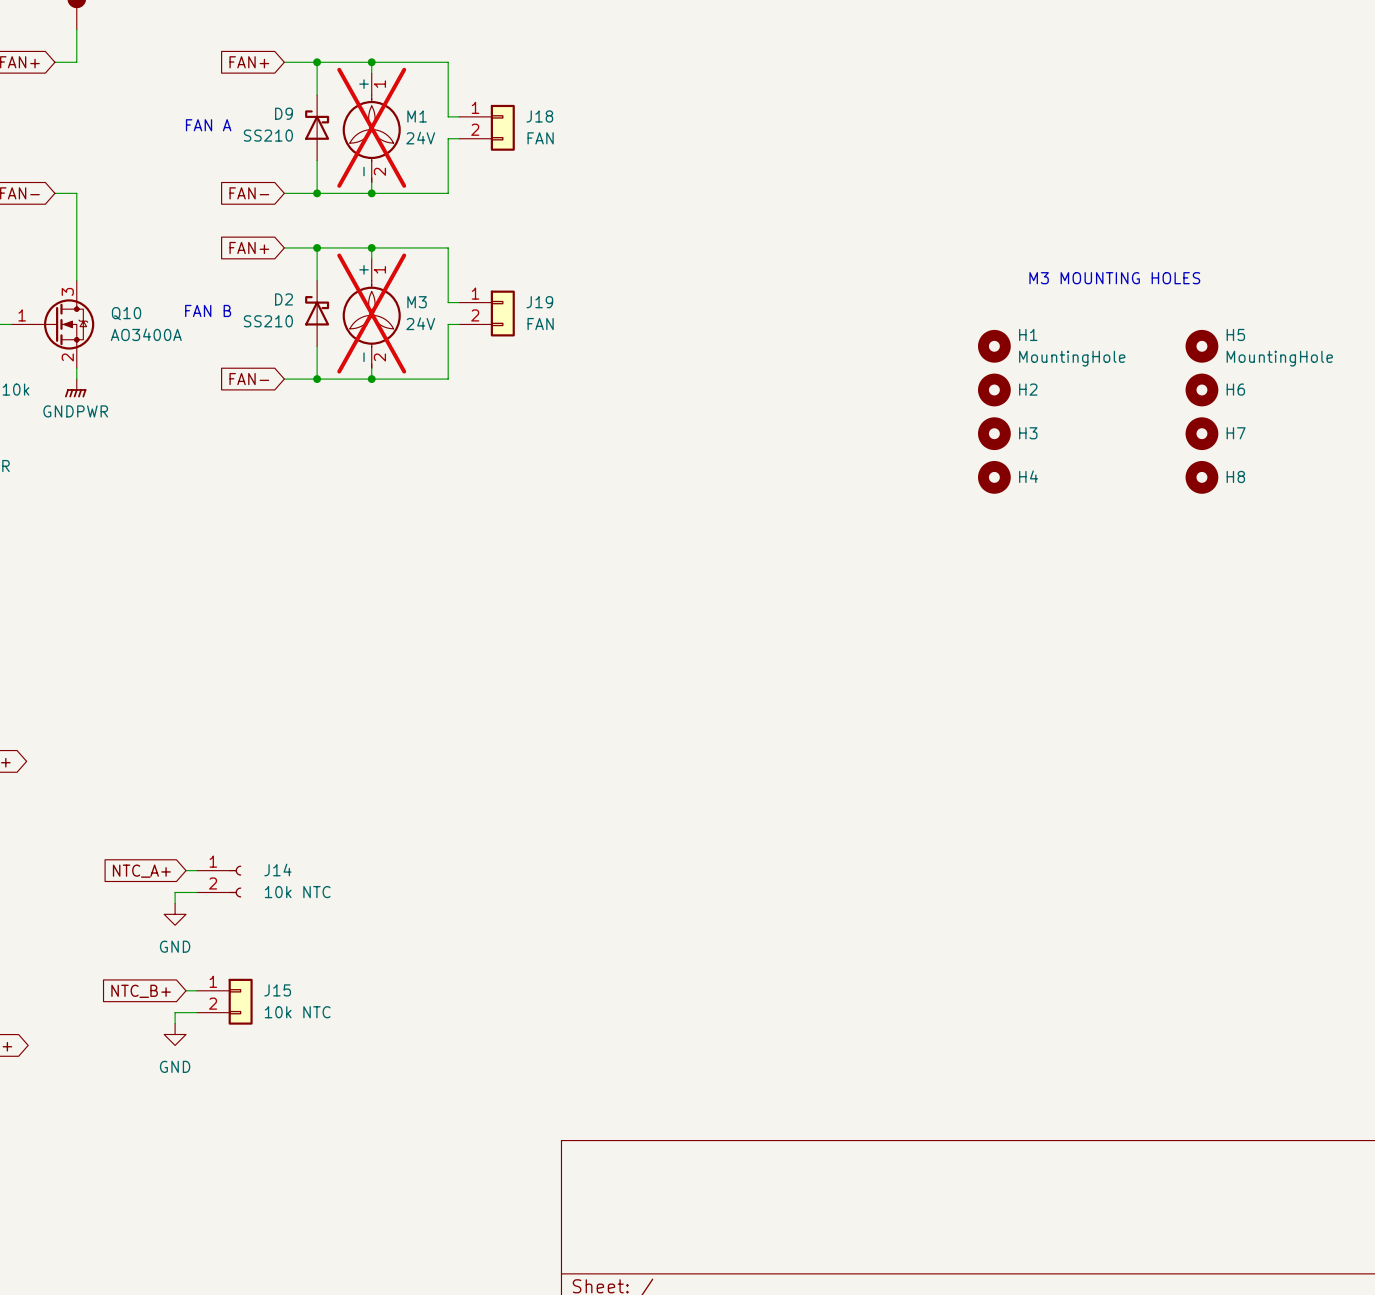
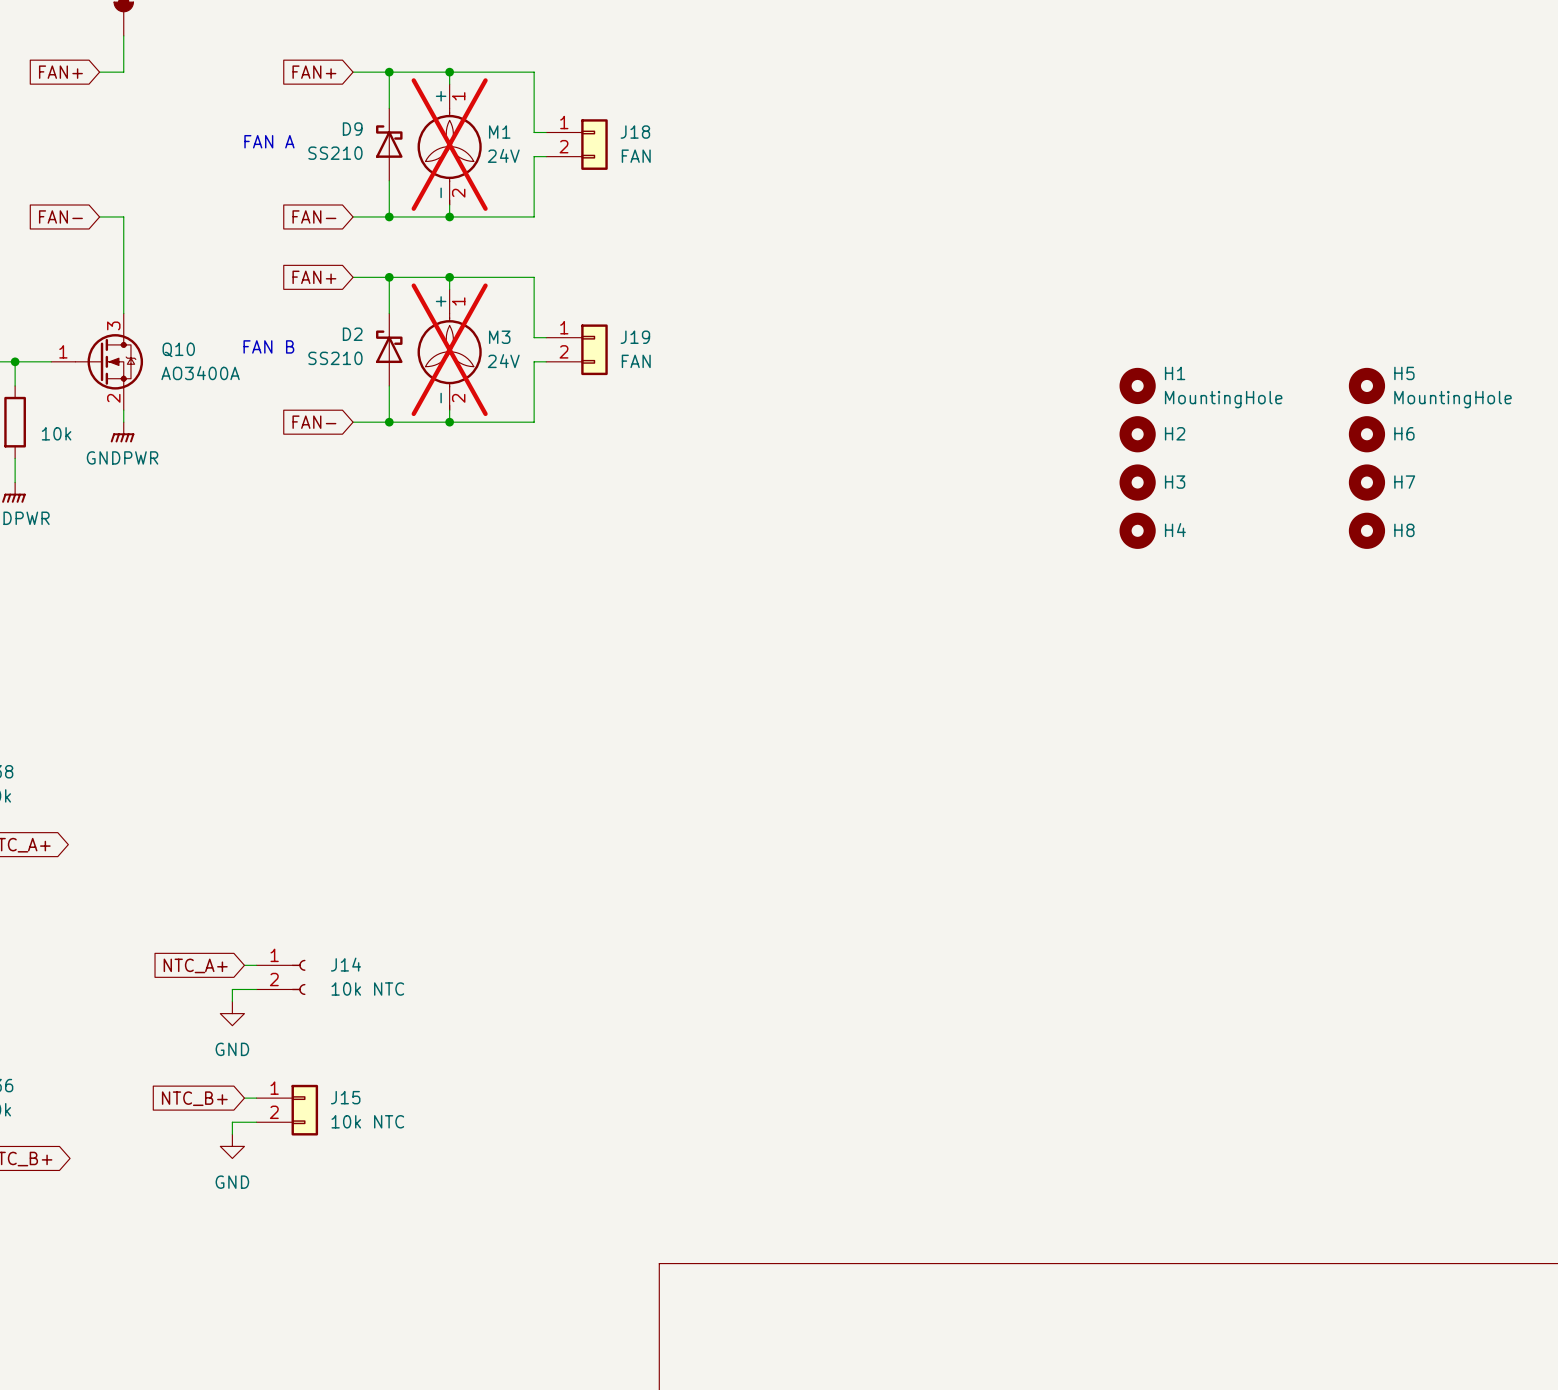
text: M3 MOUNTING HOLES (1114, 278) -> none

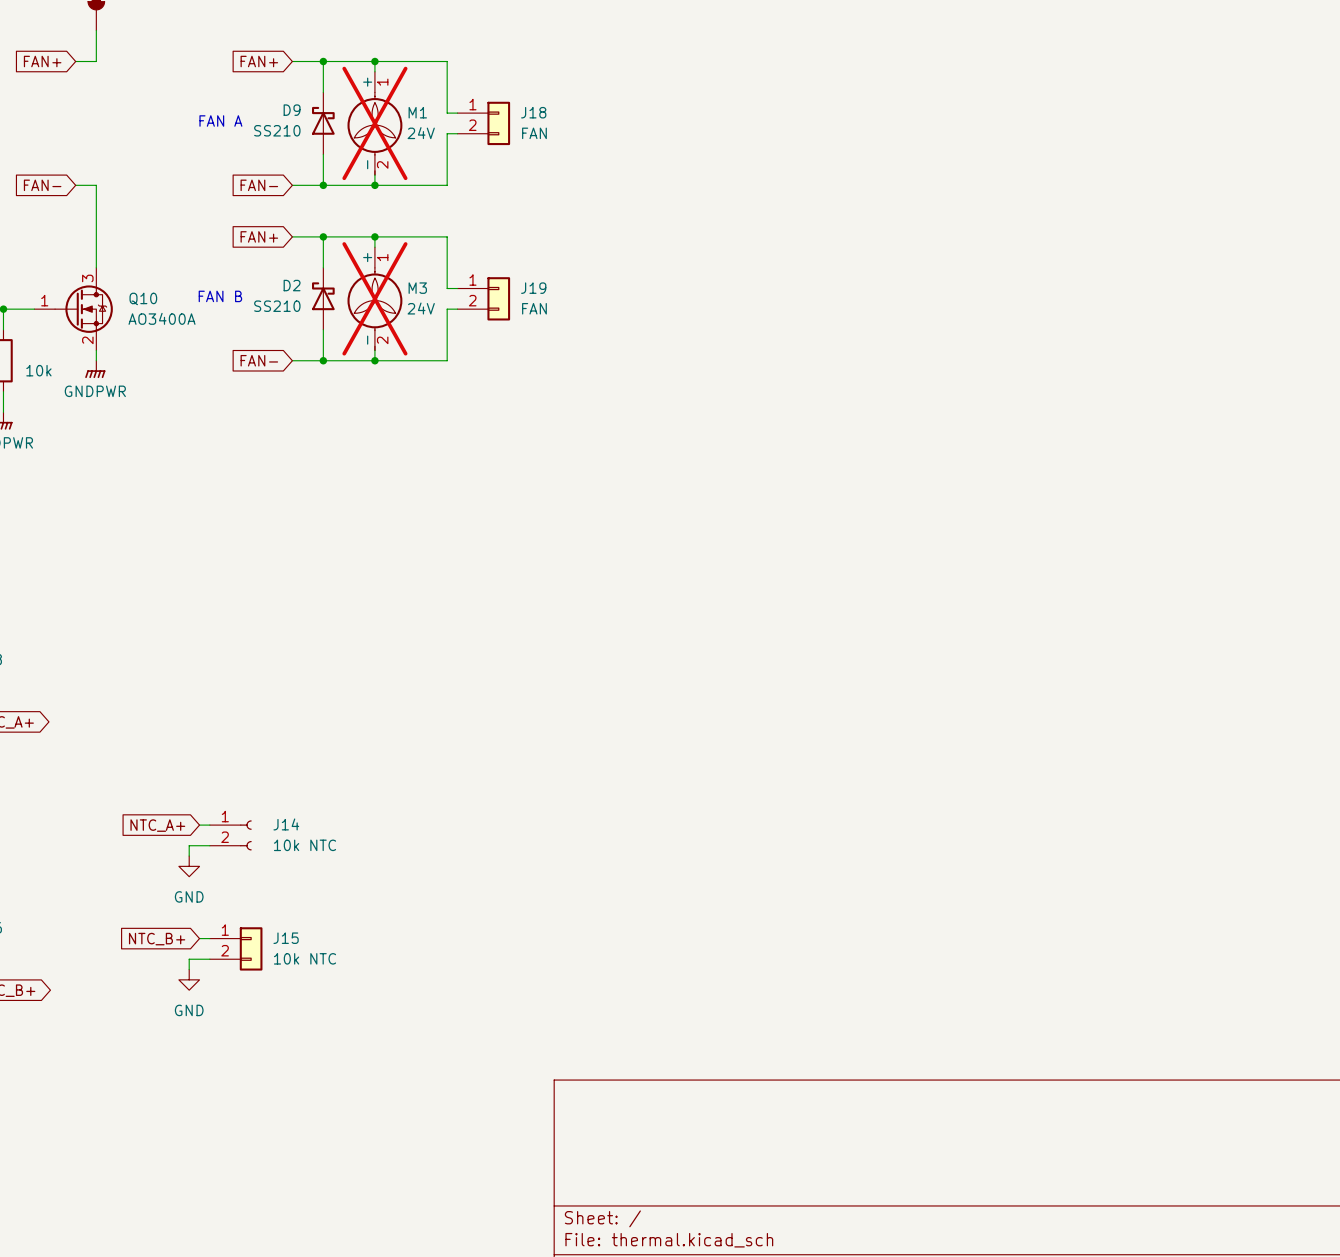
H1: MountingHole (1137, 385) -> none
H5: MountingHole (1366, 385) -> none
H2: (1137, 434) -> none
H6: (1366, 434) -> none
H3: (1137, 482) -> none
H7: (1366, 482) -> none
H4: (1137, 530) -> none
H8: (1366, 530) -> none

